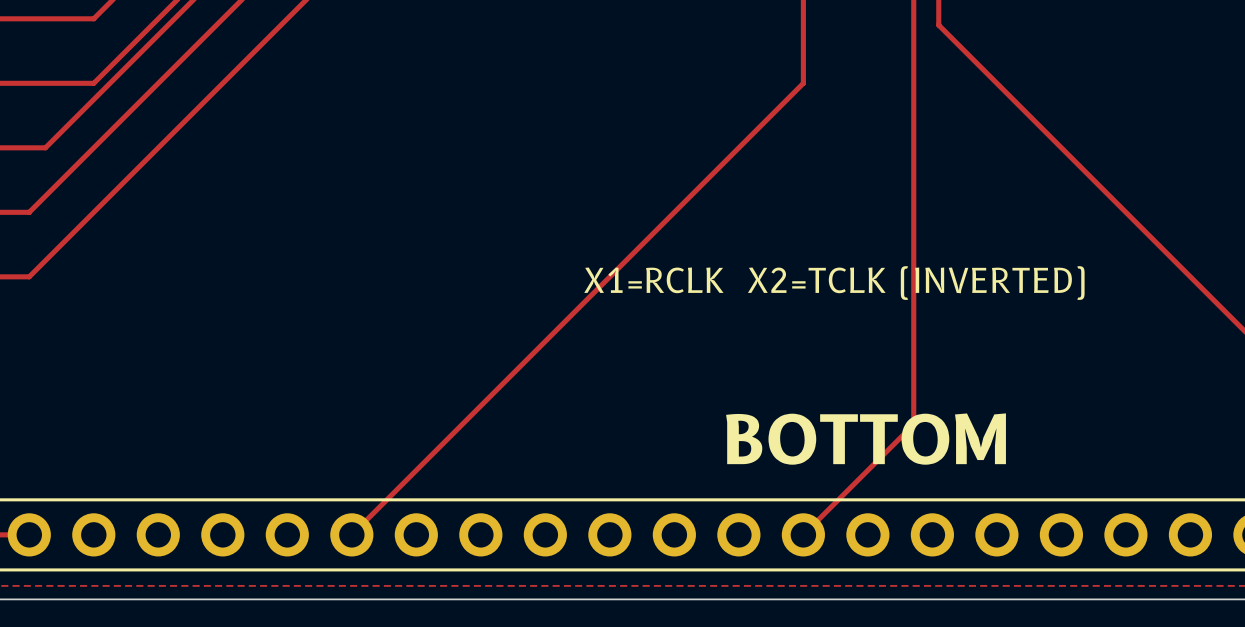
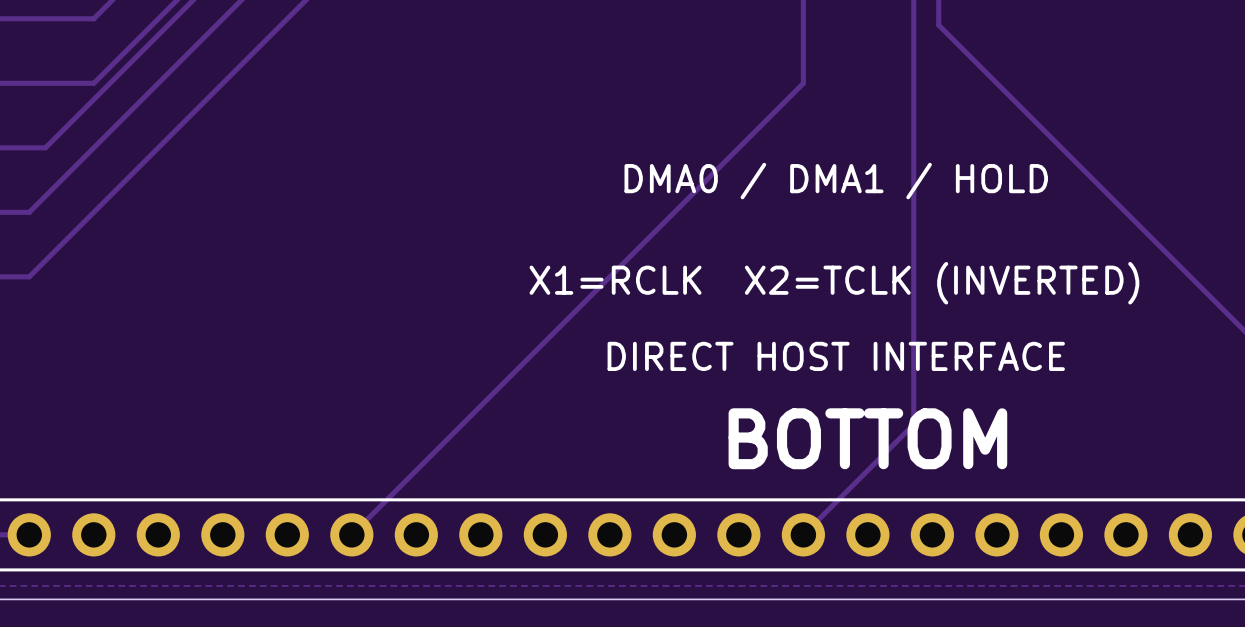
text: none -> DMA0 / DMA1 / HOLD (836, 181)
text: none -> DIRECT HOST INTERFACE (836, 356)

